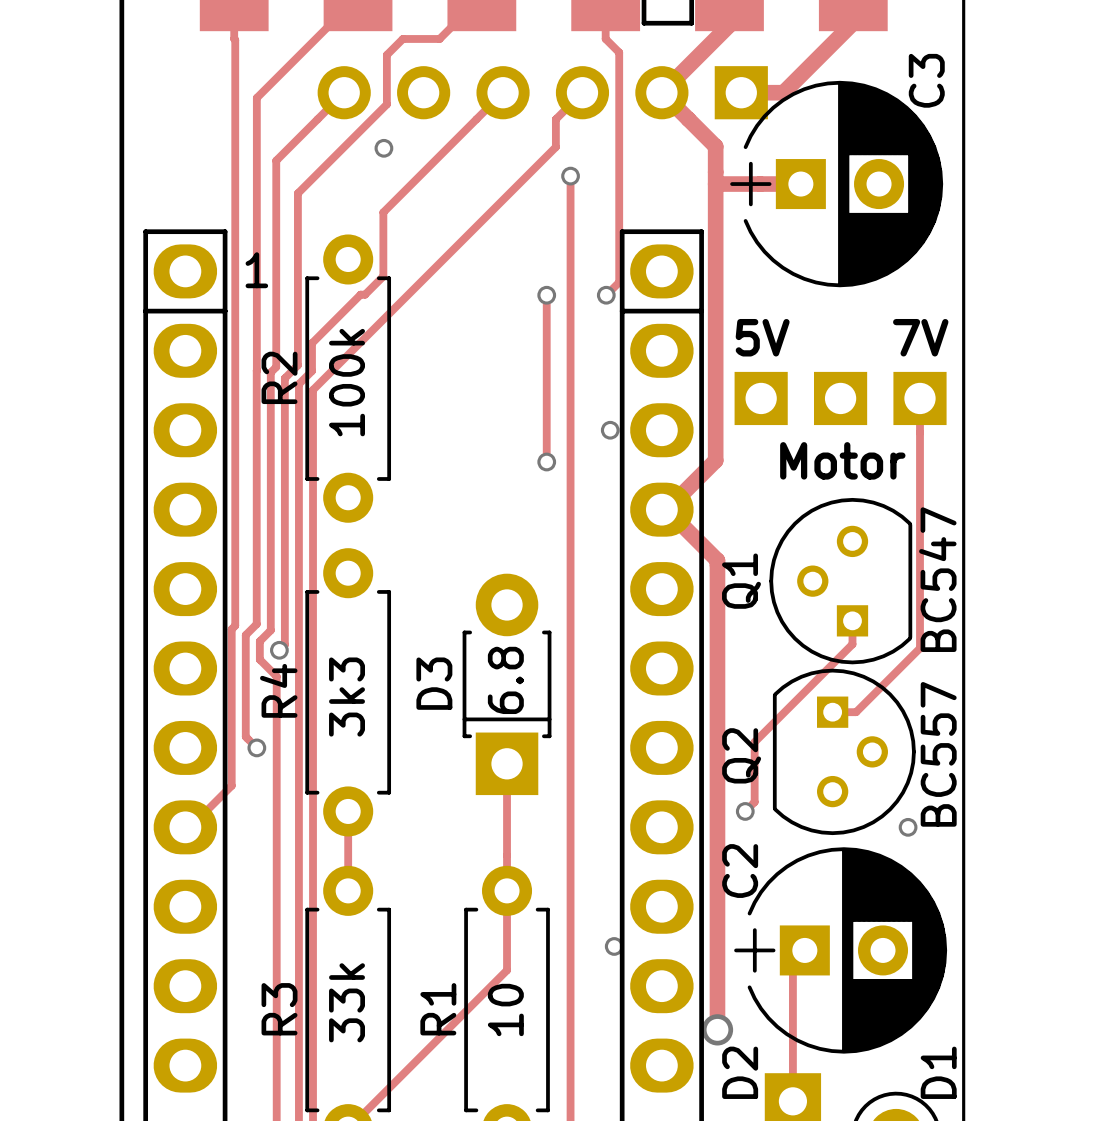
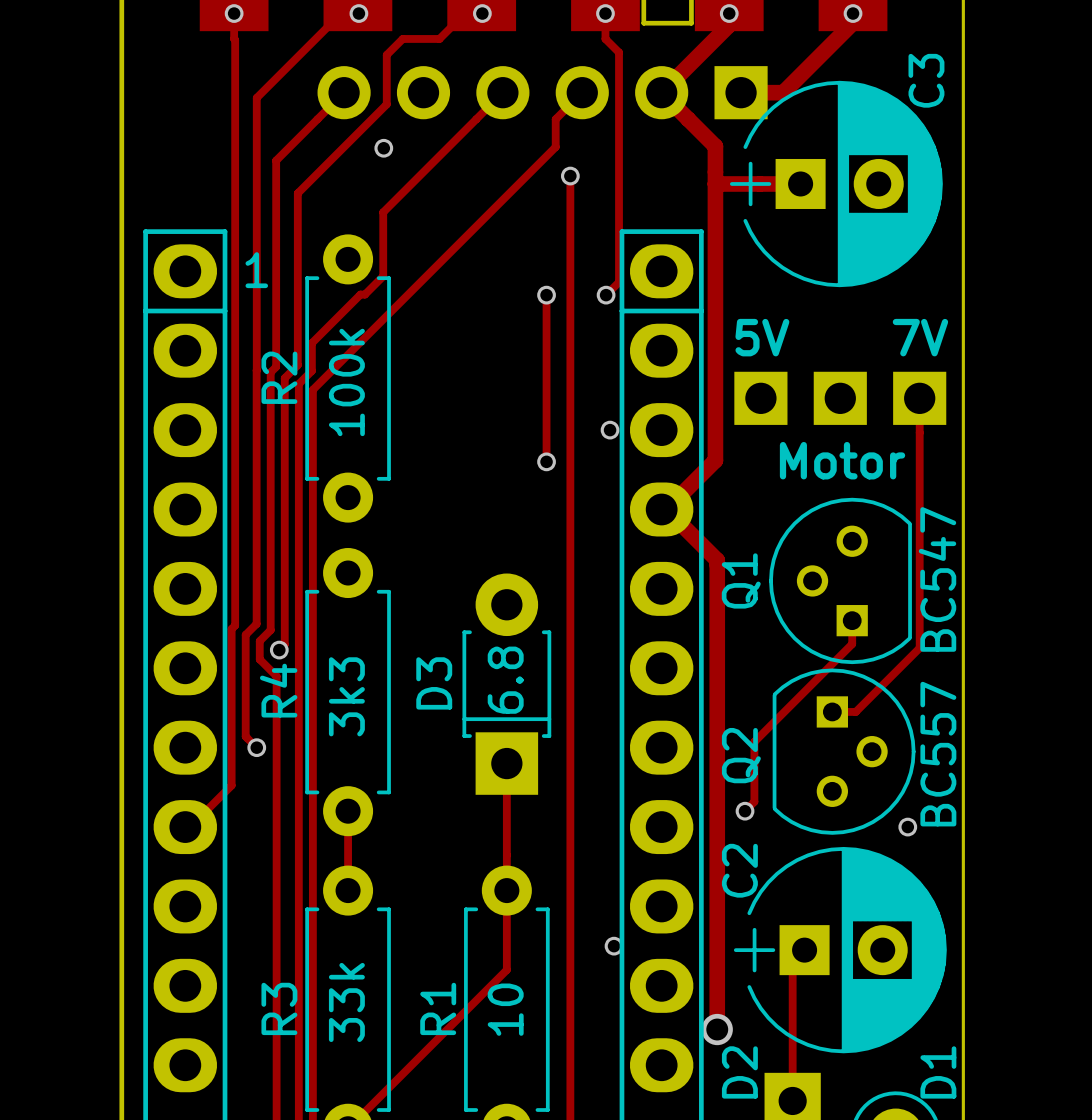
via: none -> (234, 13)
via: none -> (358, 13)
via: none -> (482, 13)
via: none -> (605, 13)
via: none -> (729, 13)
via: none -> (853, 13)

